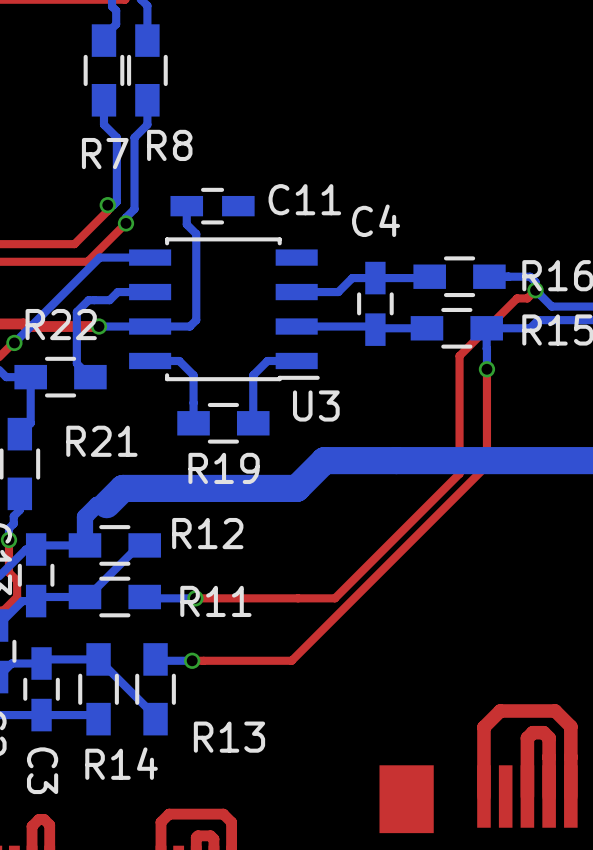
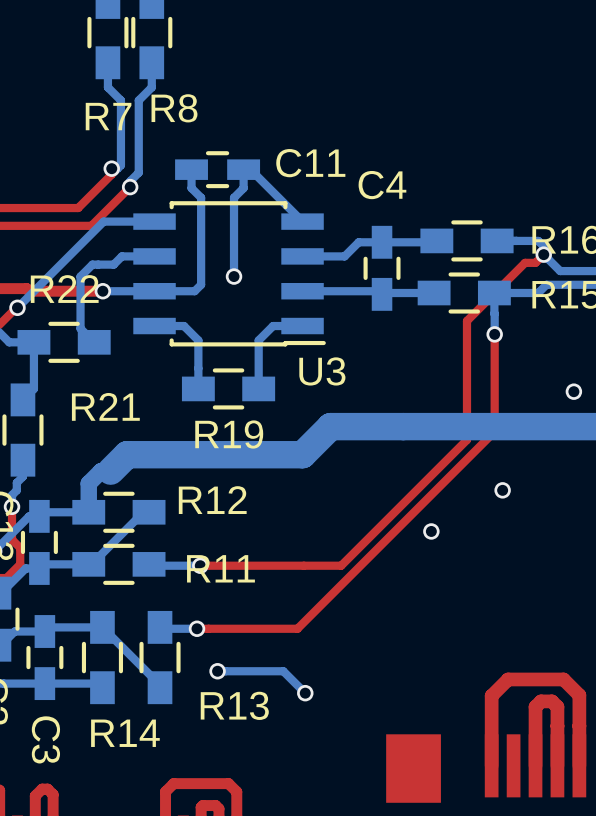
bottom track: none -> (302, 221) (250, 169) (243, 169) (243, 188) (234, 197) (234, 276)
via: none -> (234, 276)
via: none -> (573, 391)
via: none -> (502, 490)
via: none -> (431, 531)
bottom track: none -> (217, 671) (283, 671) (305, 693)
via: none -> (217, 671)
via: none -> (305, 693)

